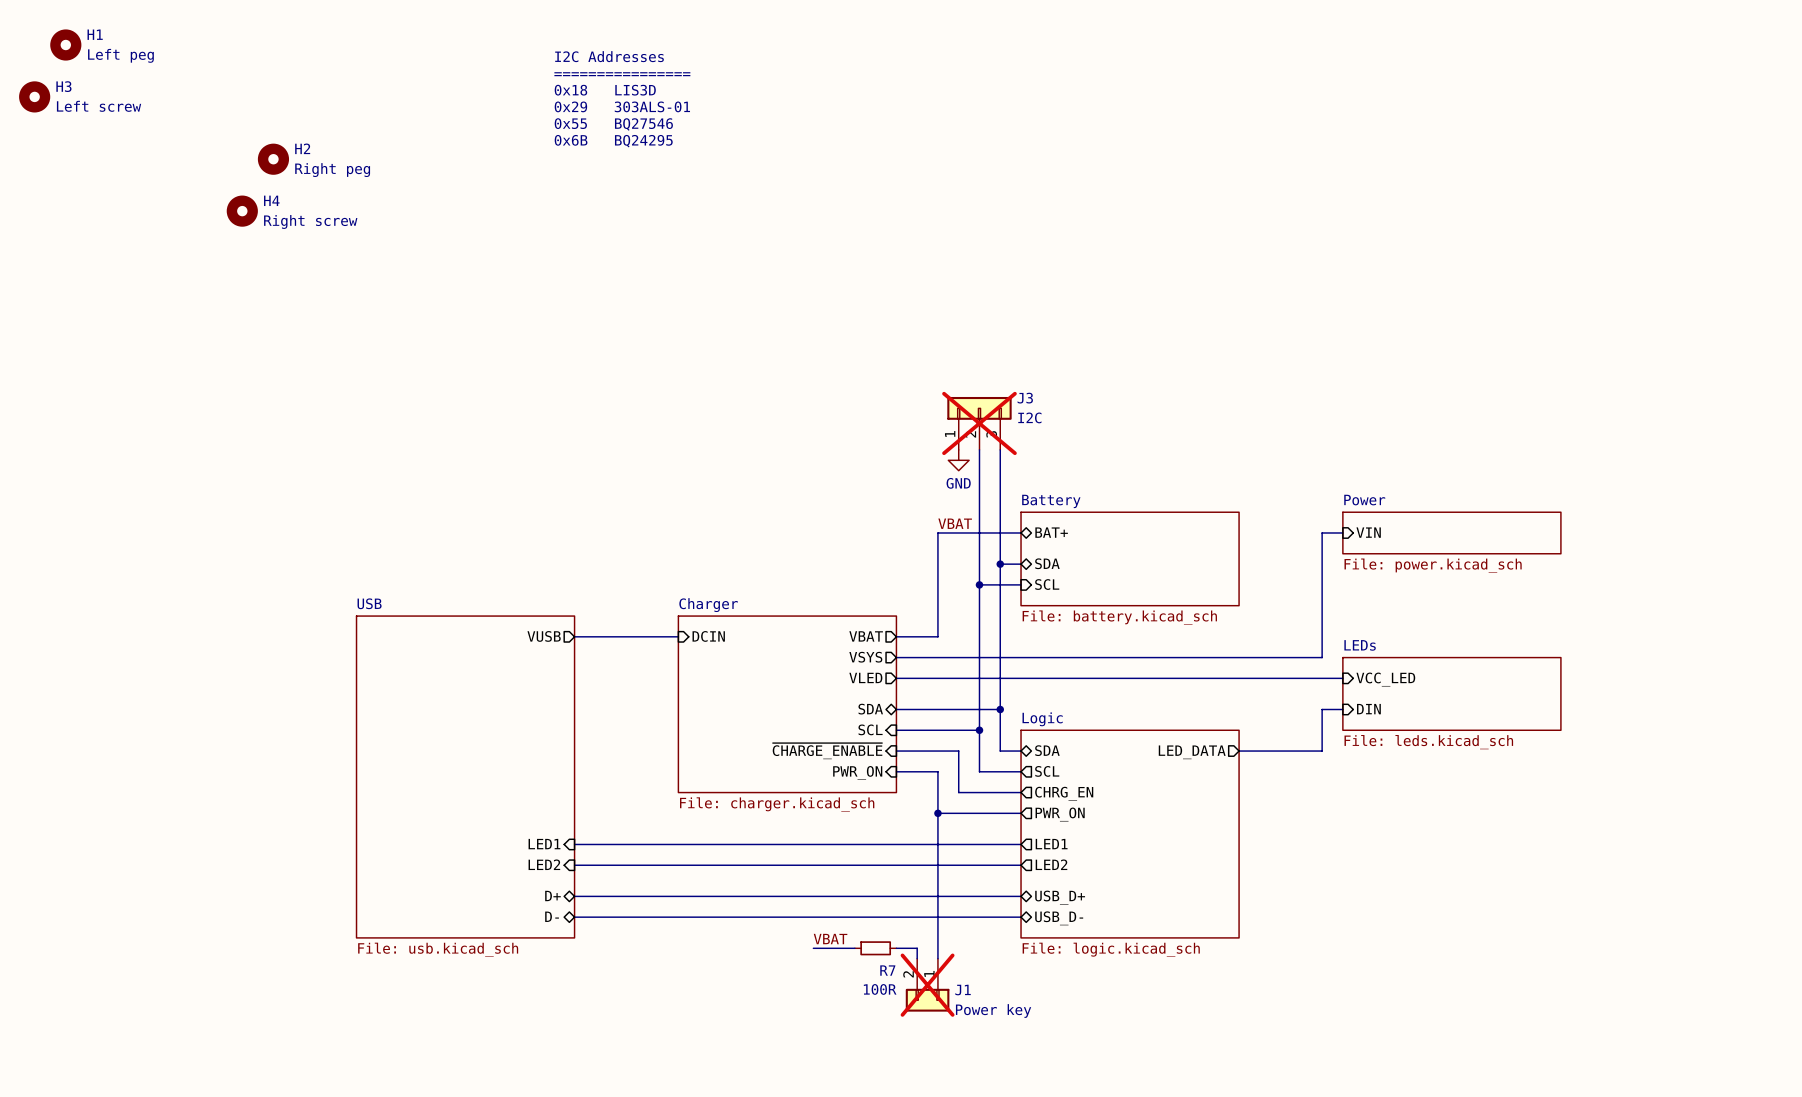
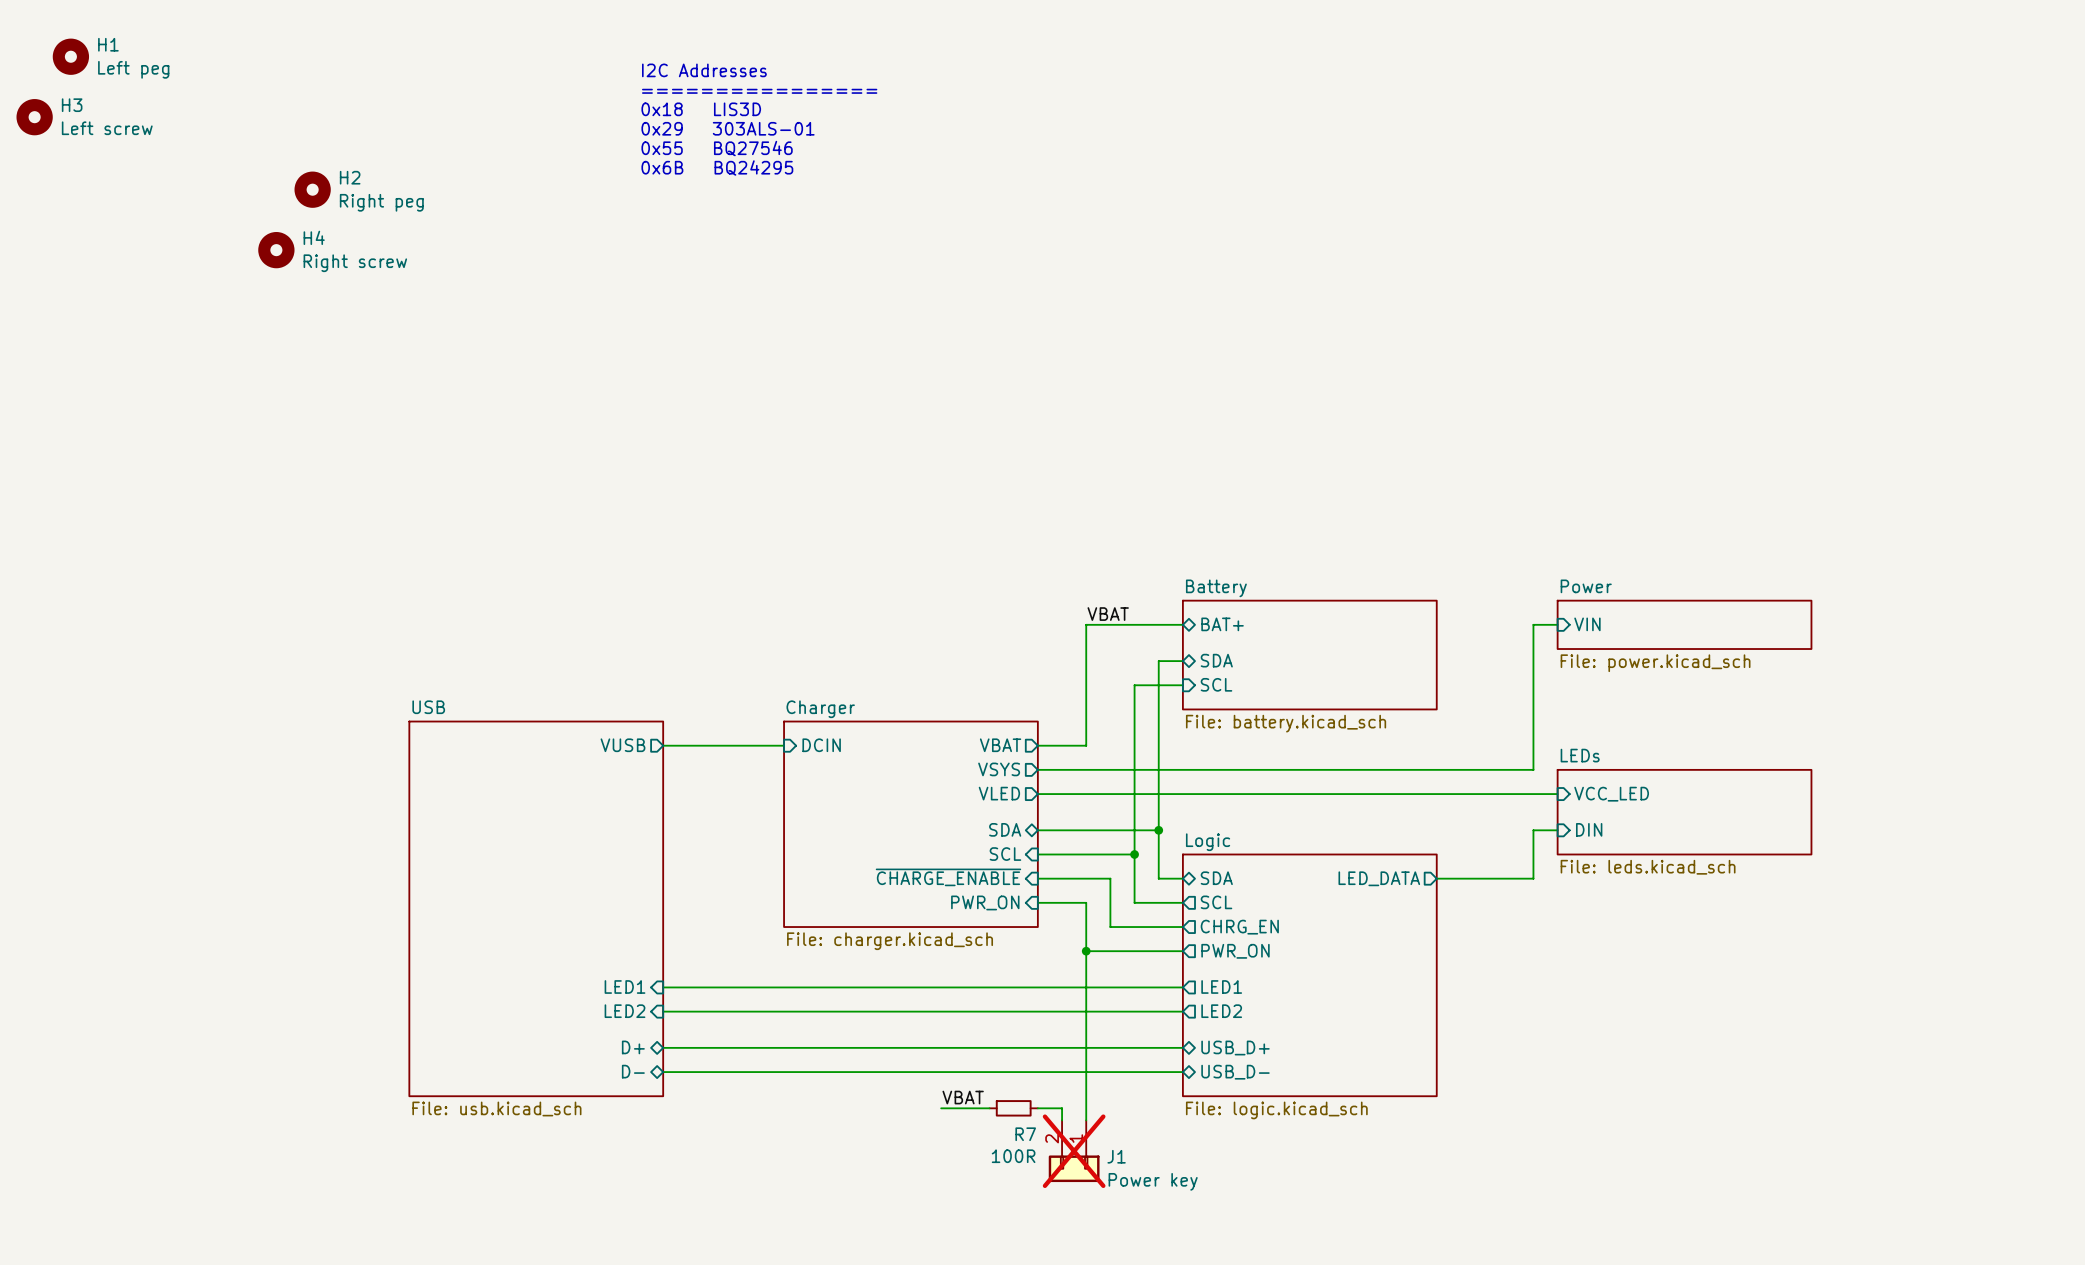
J3: I2C (979, 423) -> none
wire: (979, 449) (979, 584) -> none
wire: (1000, 449) (1000, 564) -> none
power symbol: GND (958, 460) -> none
junction: (1000, 564) -> none
junction: (979, 584) -> none

